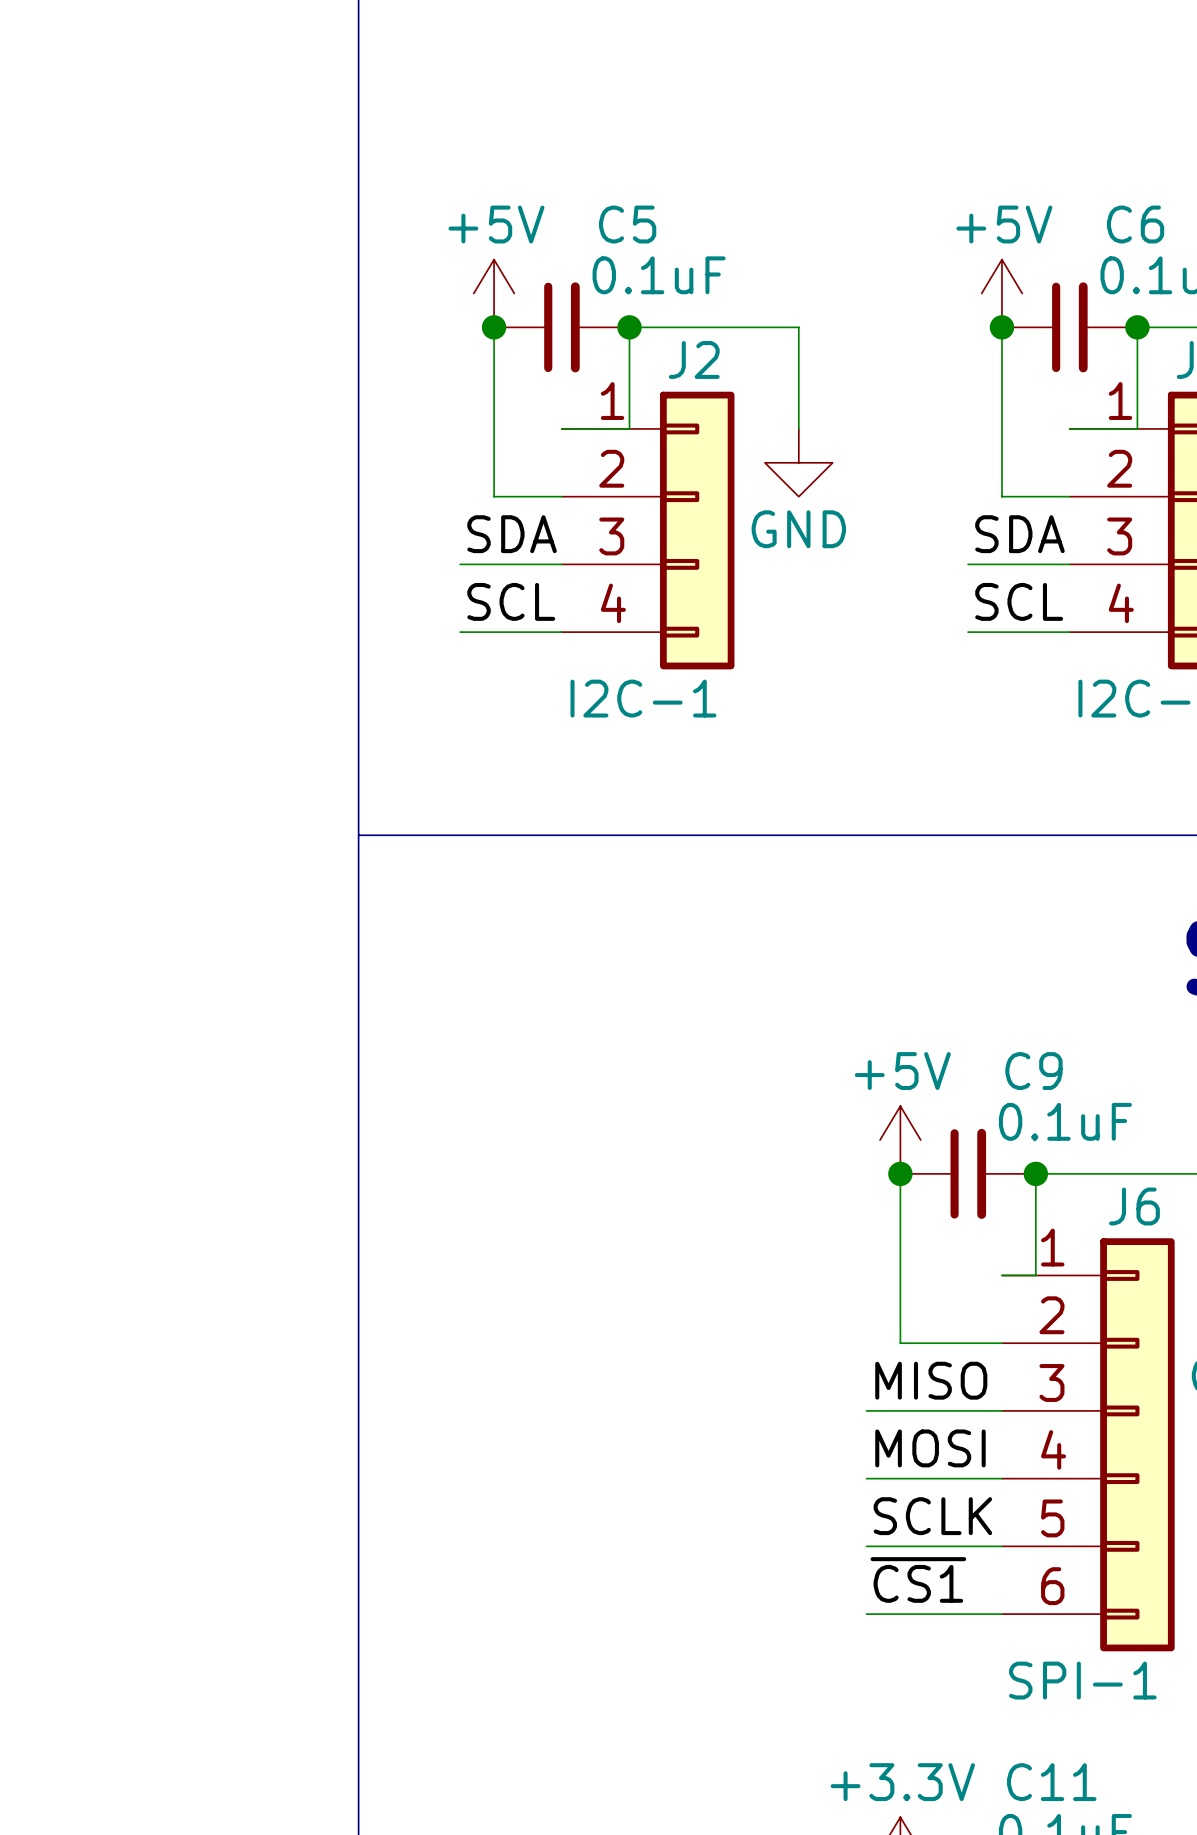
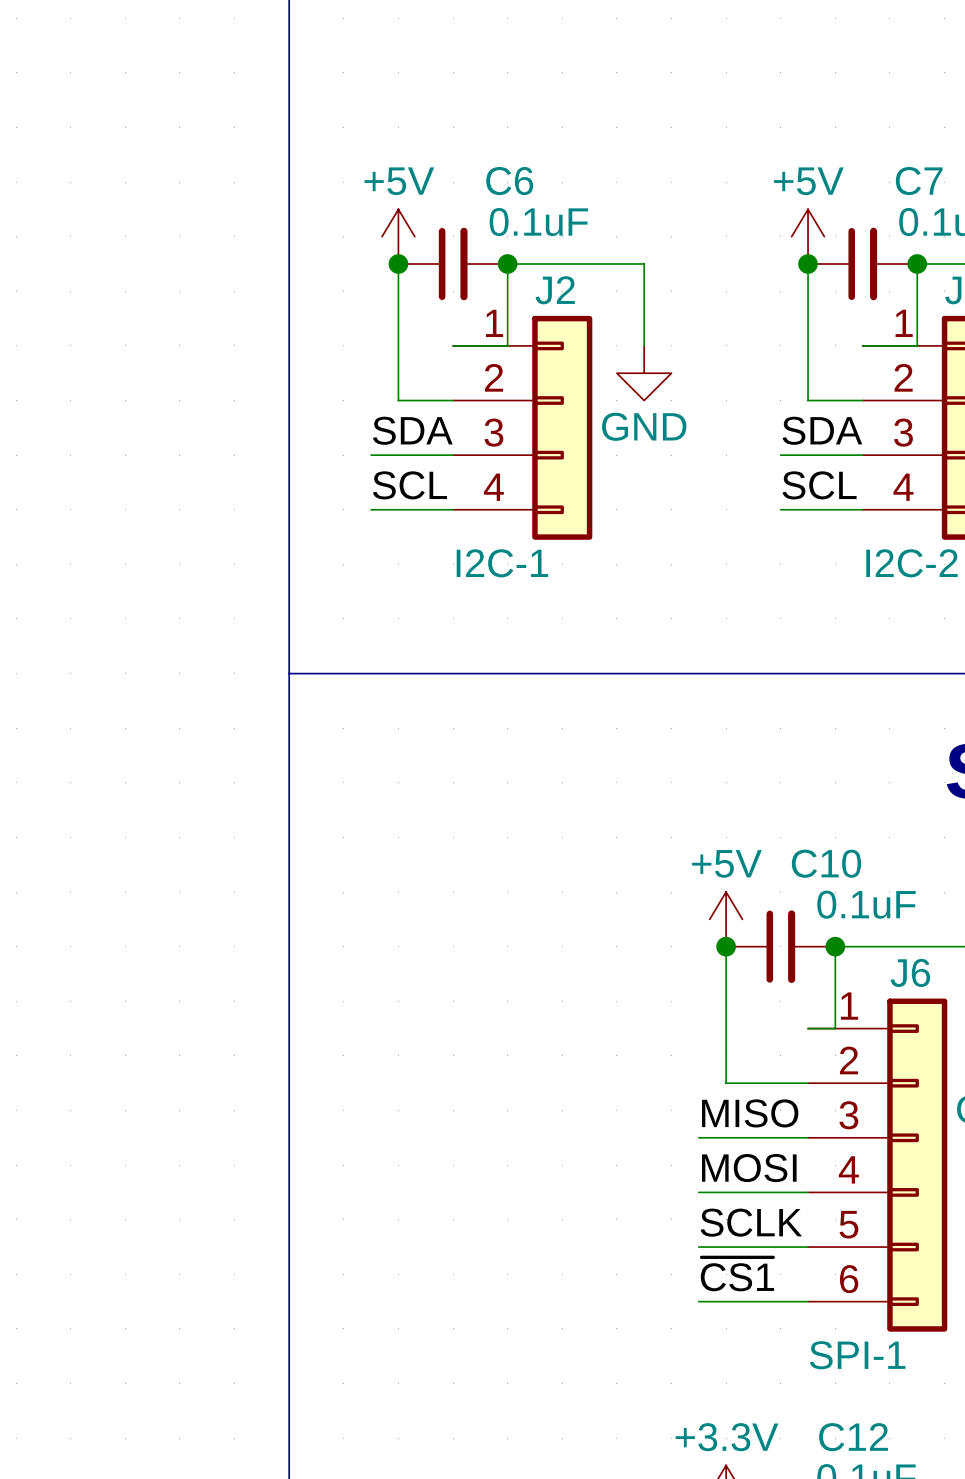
C5 name: C5 (627, 224) -> C6 (509, 181)
C6 name: C6 (1135, 224) -> C7 (919, 181)
C9 name: C9 (1033, 1071) -> C10 (826, 863)
C11 name: C11 (1051, 1782) -> C12 (853, 1437)

